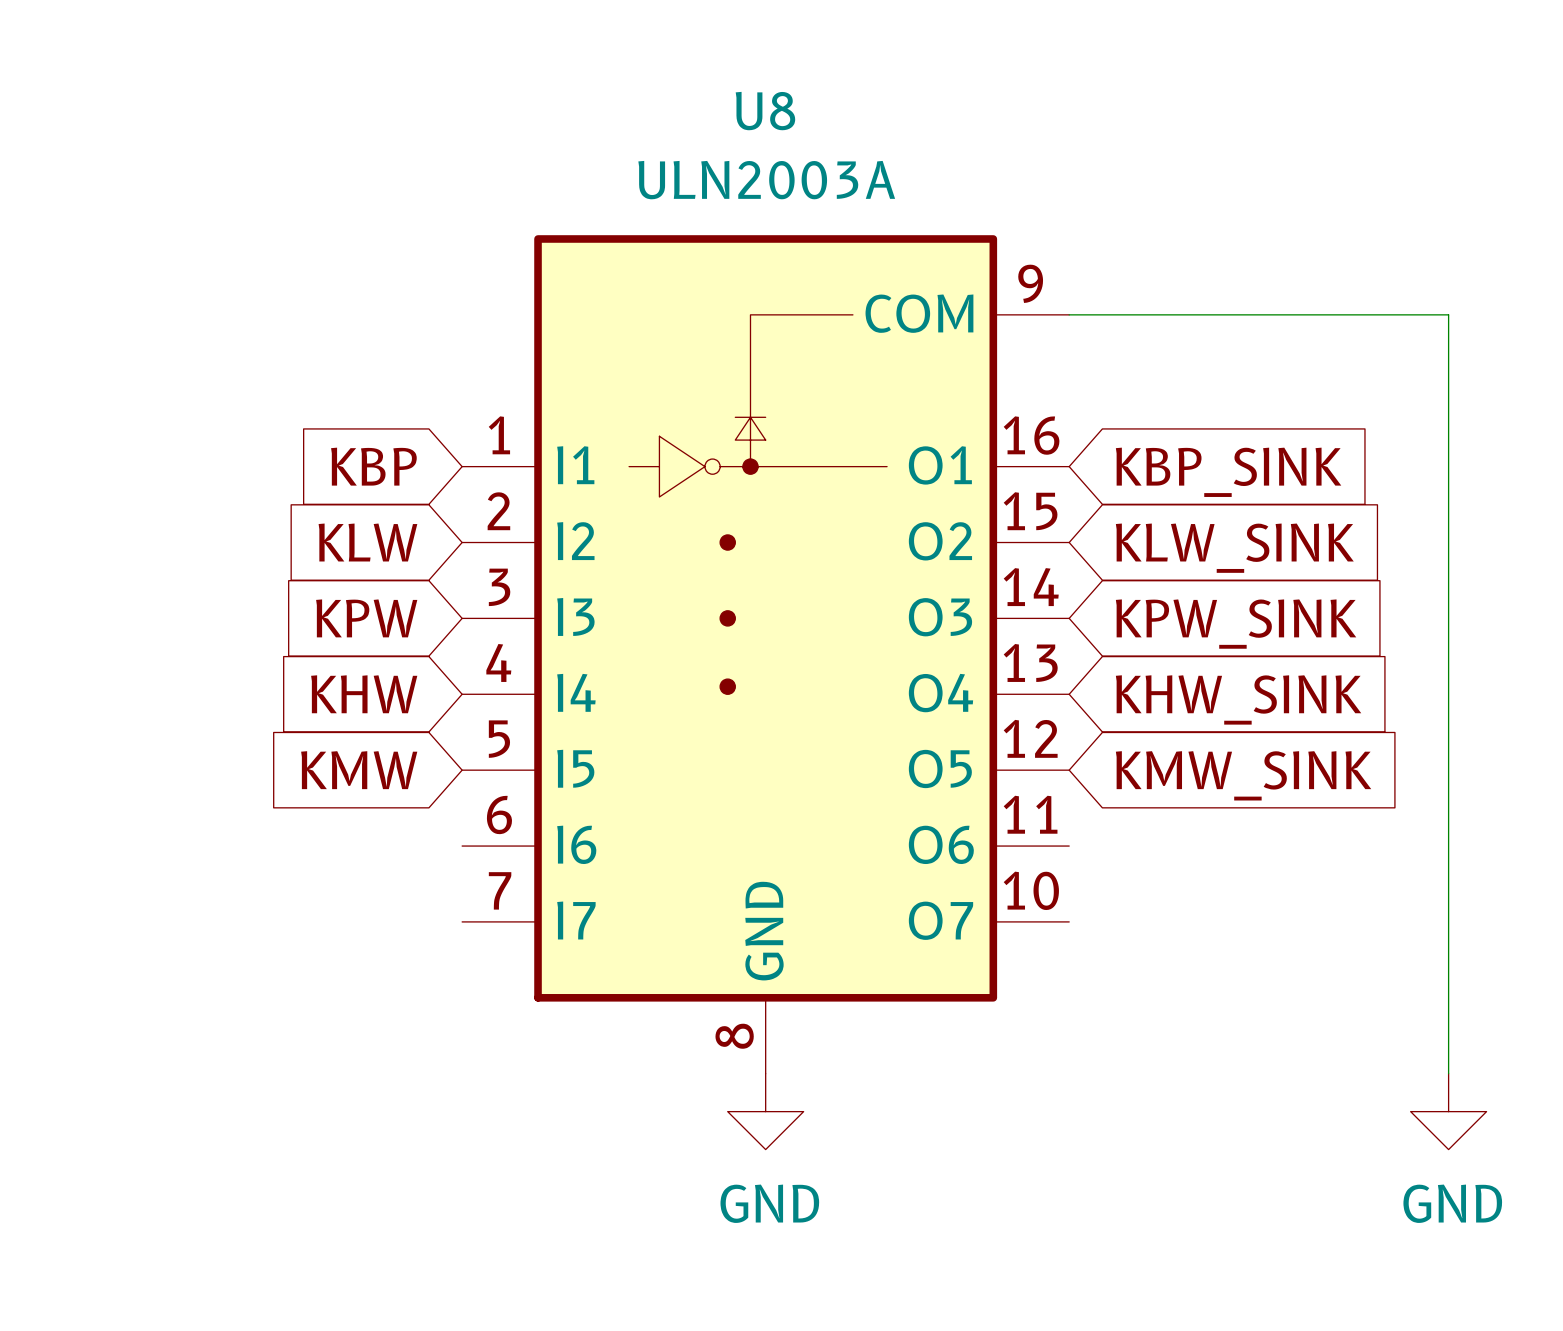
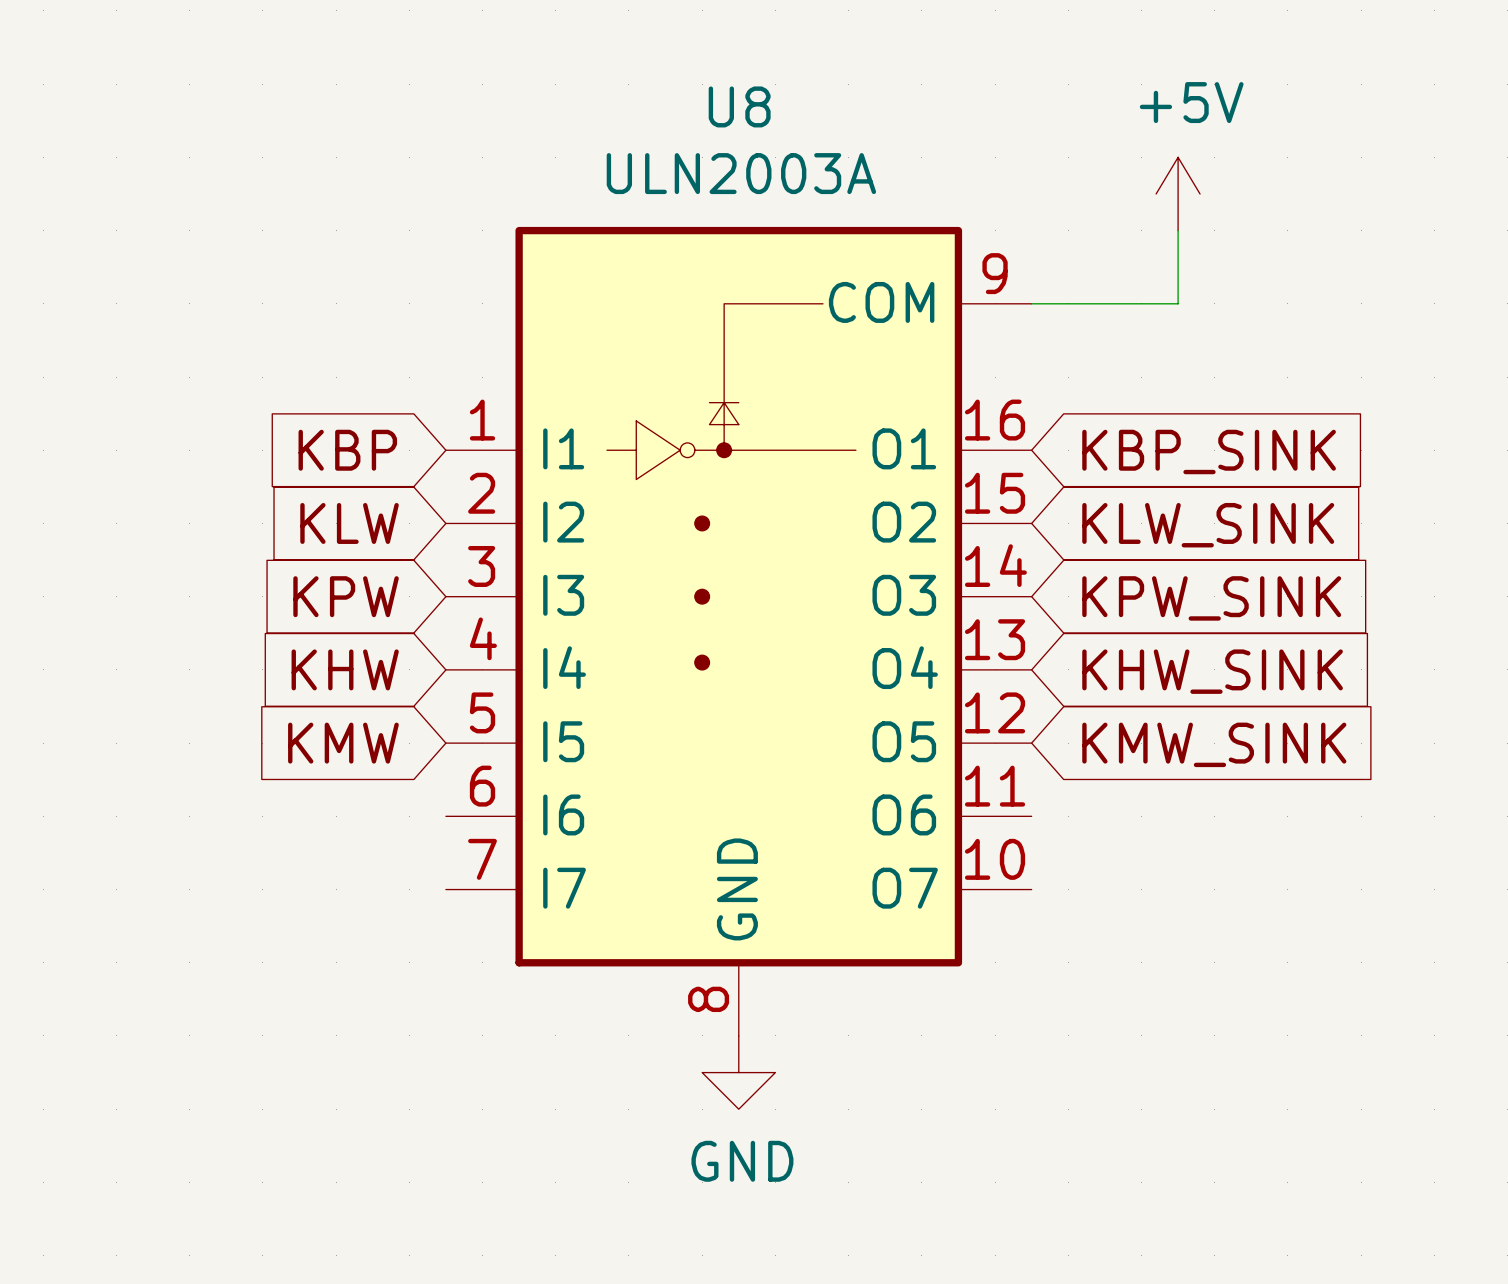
power symbol: none -> +5V (1178, 193)
wire: (1220, 314) (1448, 314) (1448, 1073) -> (1178, 303) (1178, 230)
power symbol: GND (1448, 1111) -> none

